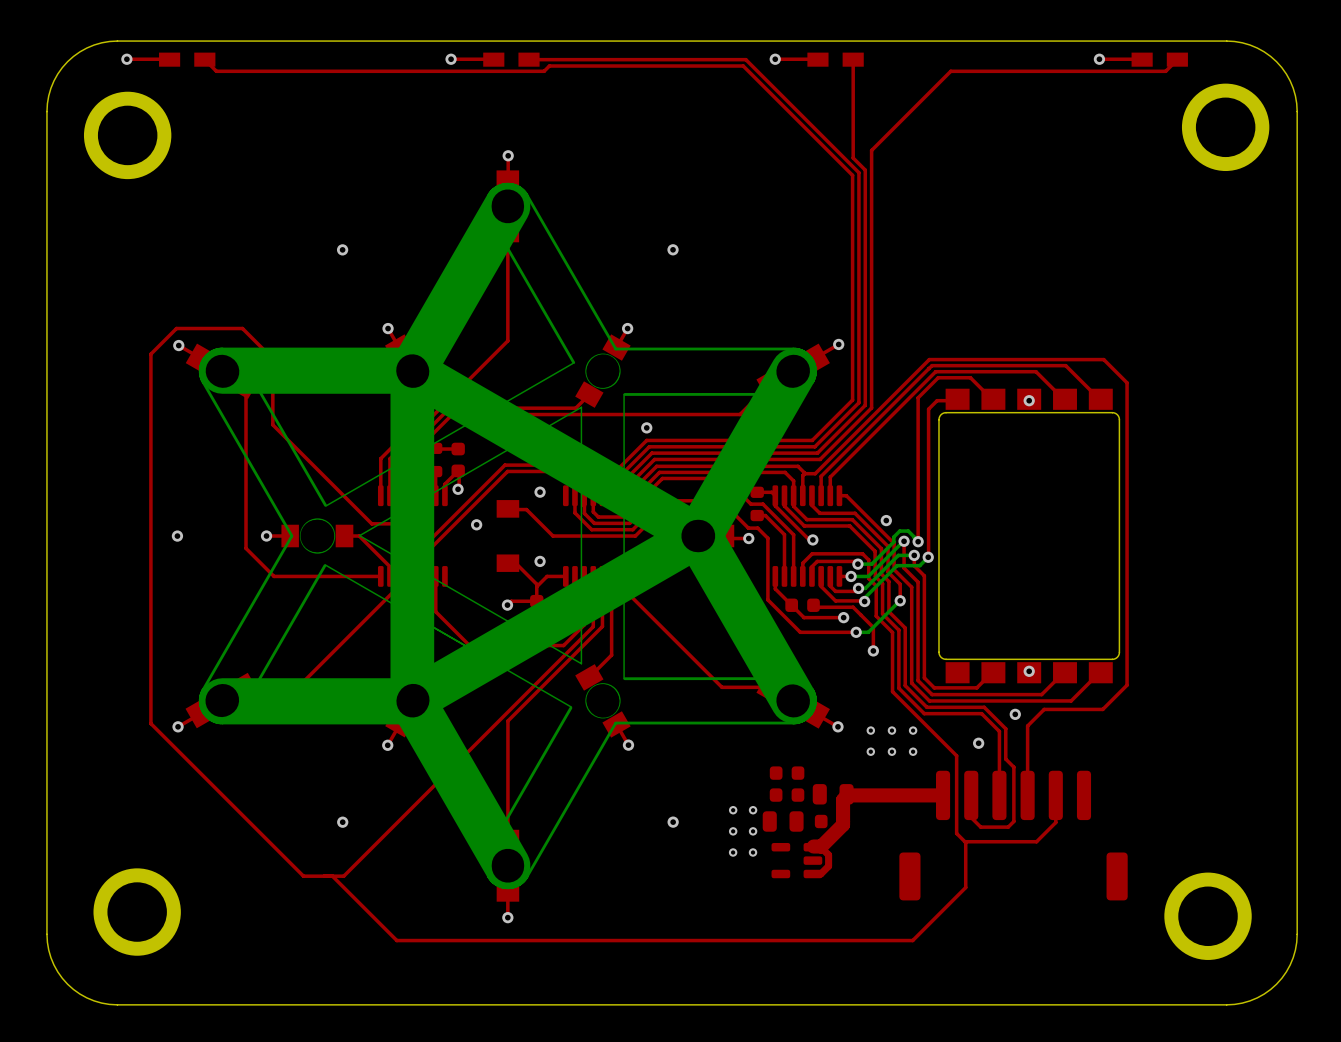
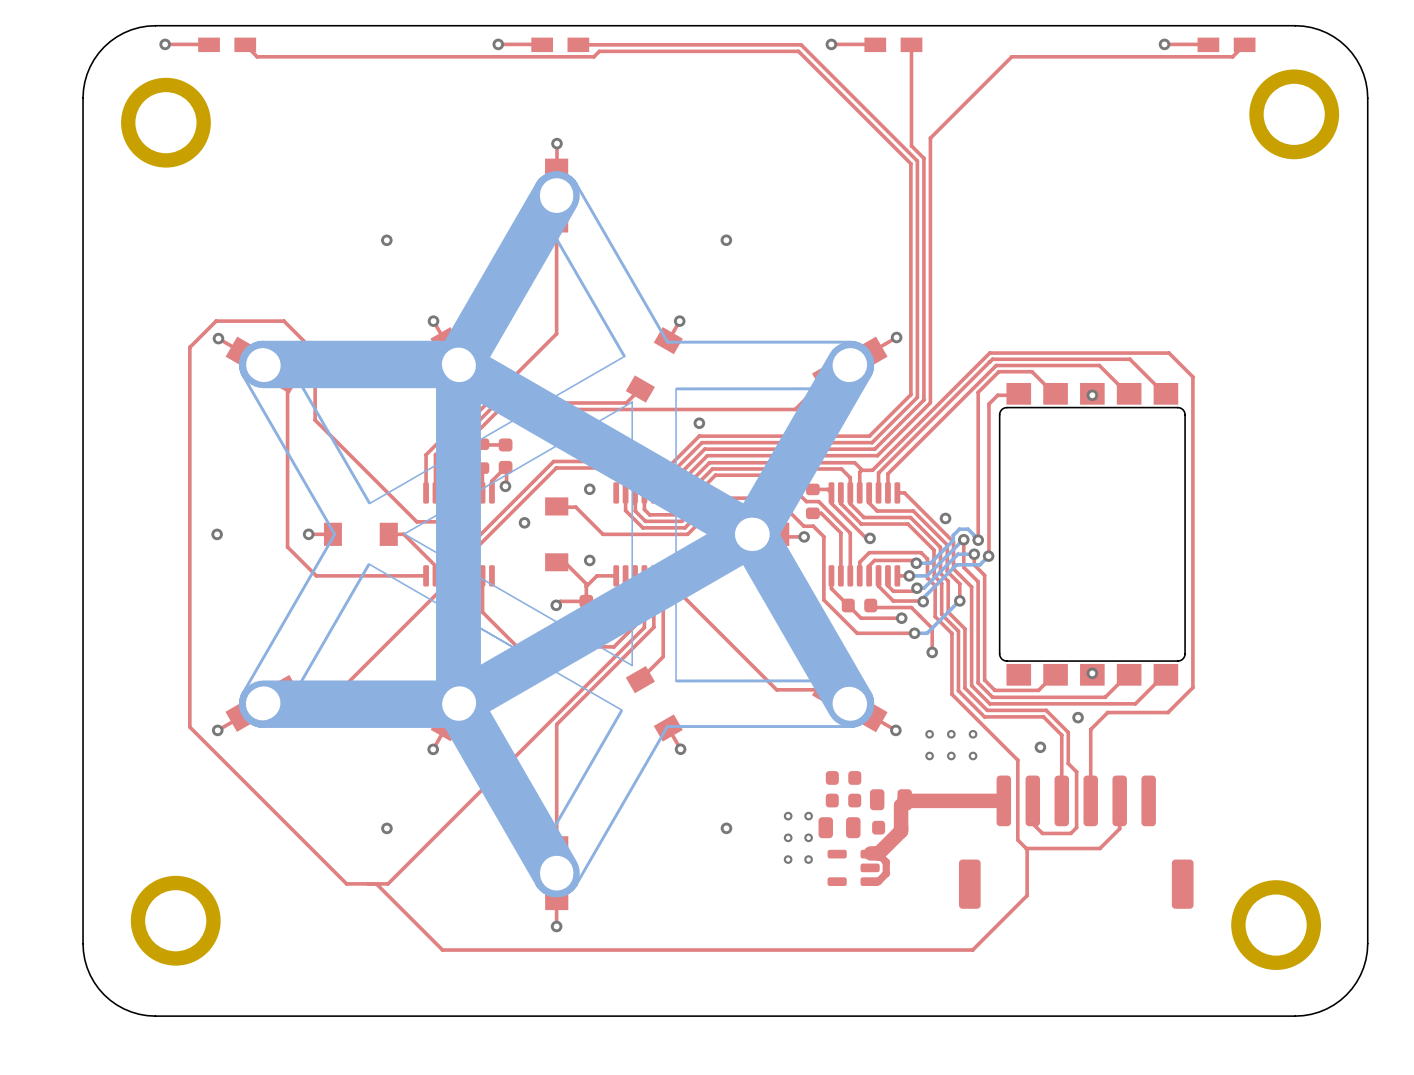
drawing shape: [198, 182, 817, 890] -> [239, 171, 875, 898]

